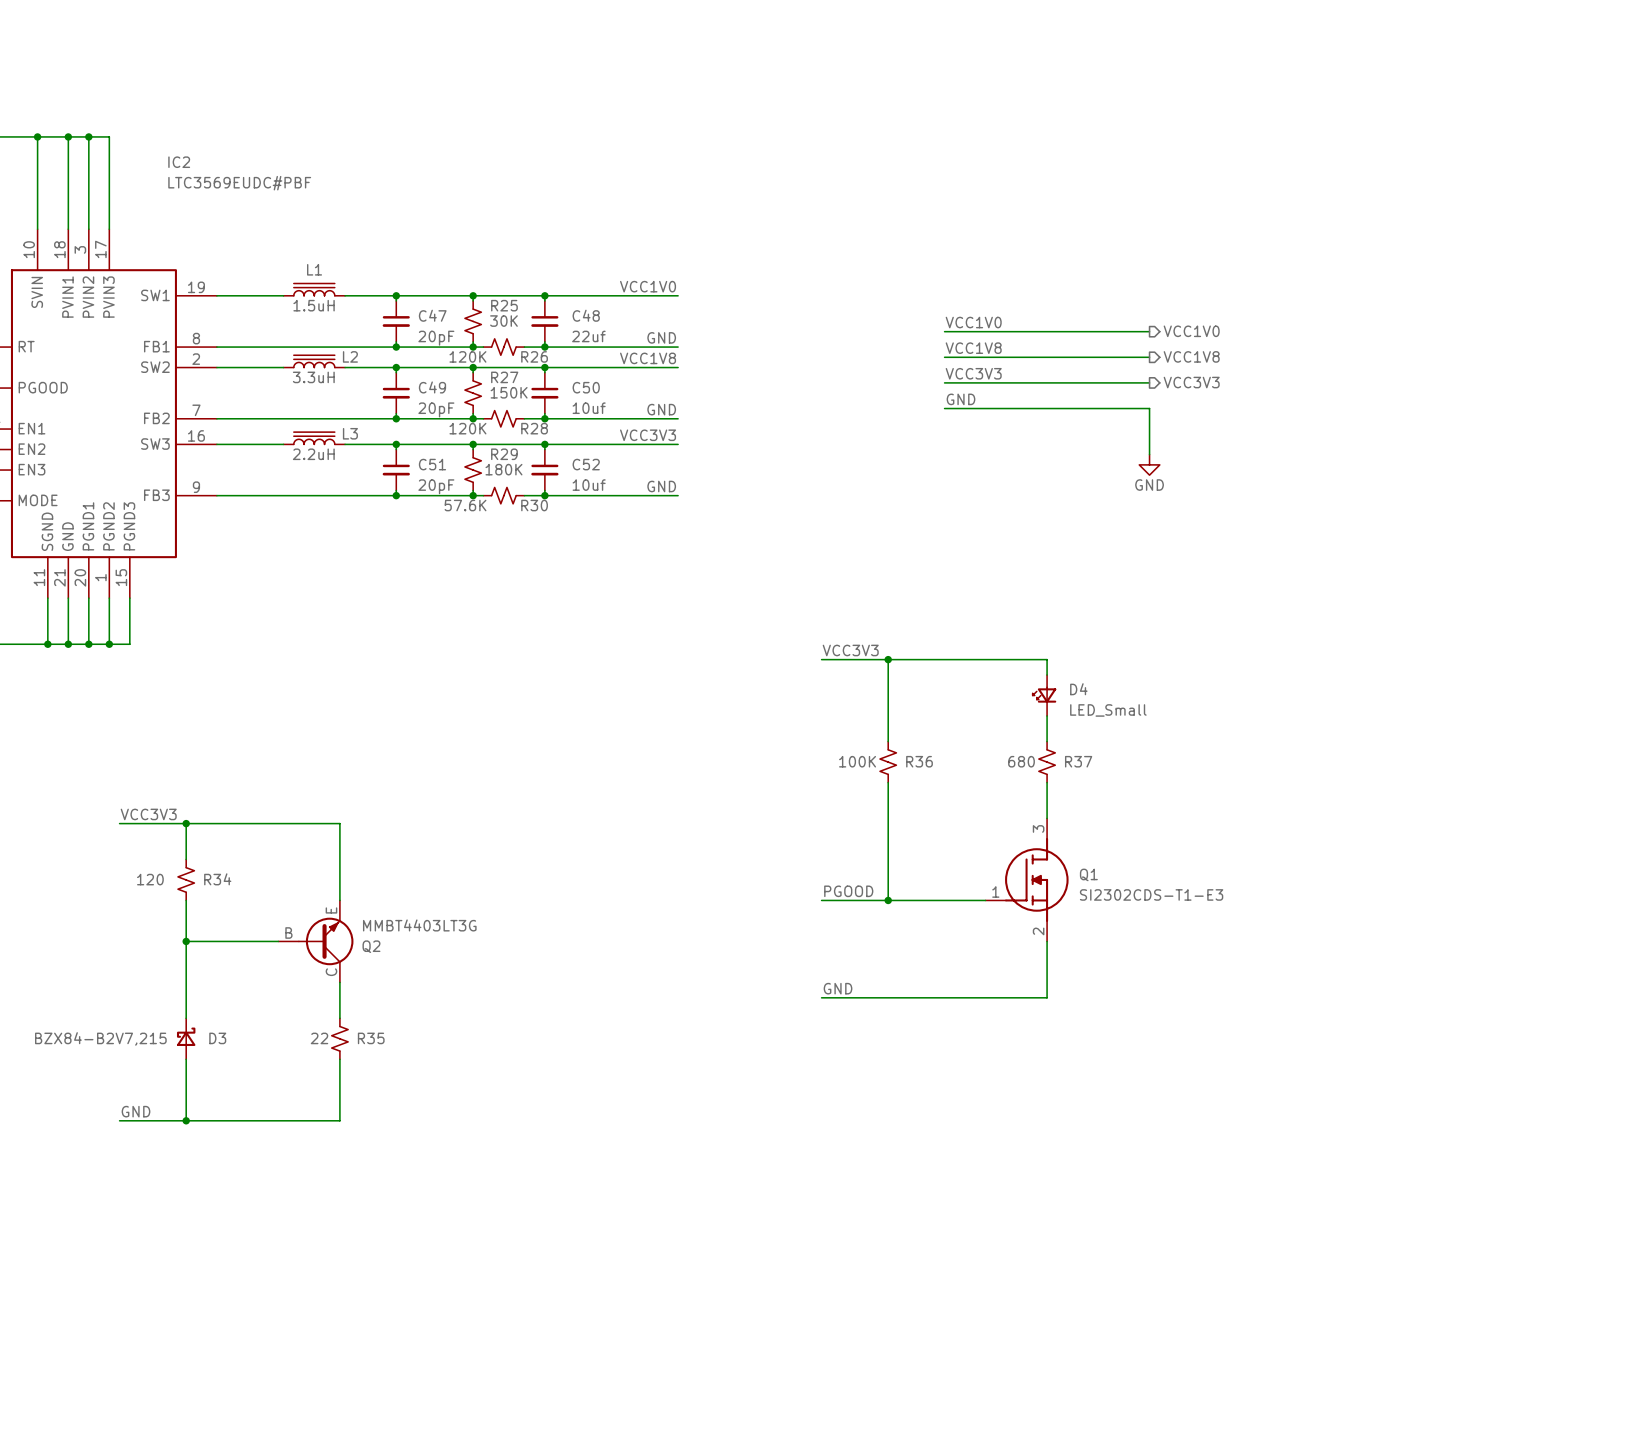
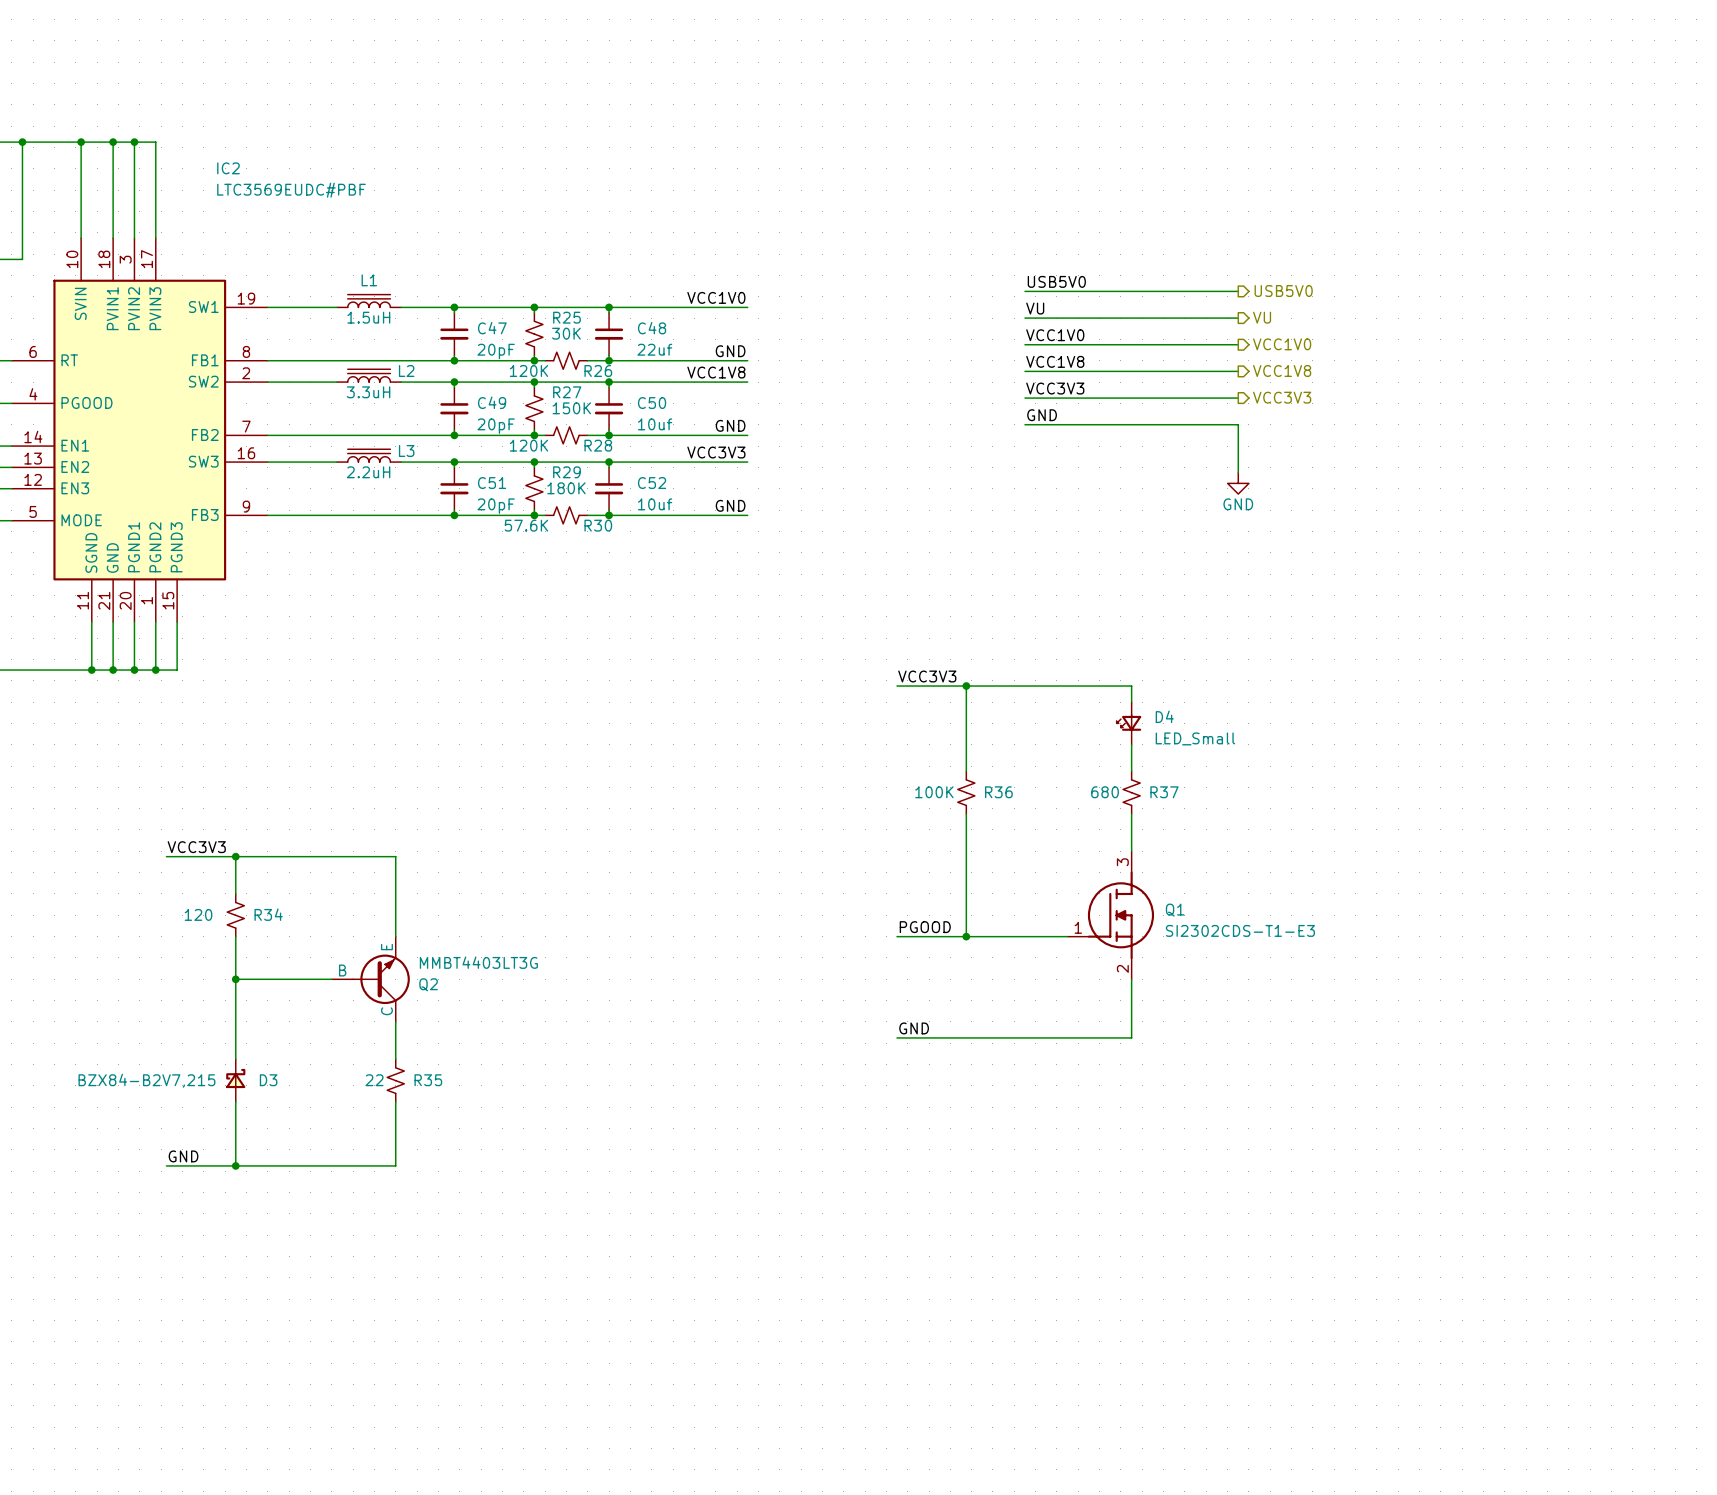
label: none -> USB5V0 (1056, 281)
wire: none -> (1024, 291) (1238, 291)
hierarchical label: none -> USB5V0 (1283, 291)
label: none -> VU (1035, 308)
hierarchical label: none -> VU (1262, 317)
wire: none -> (1024, 318) (1238, 318)

